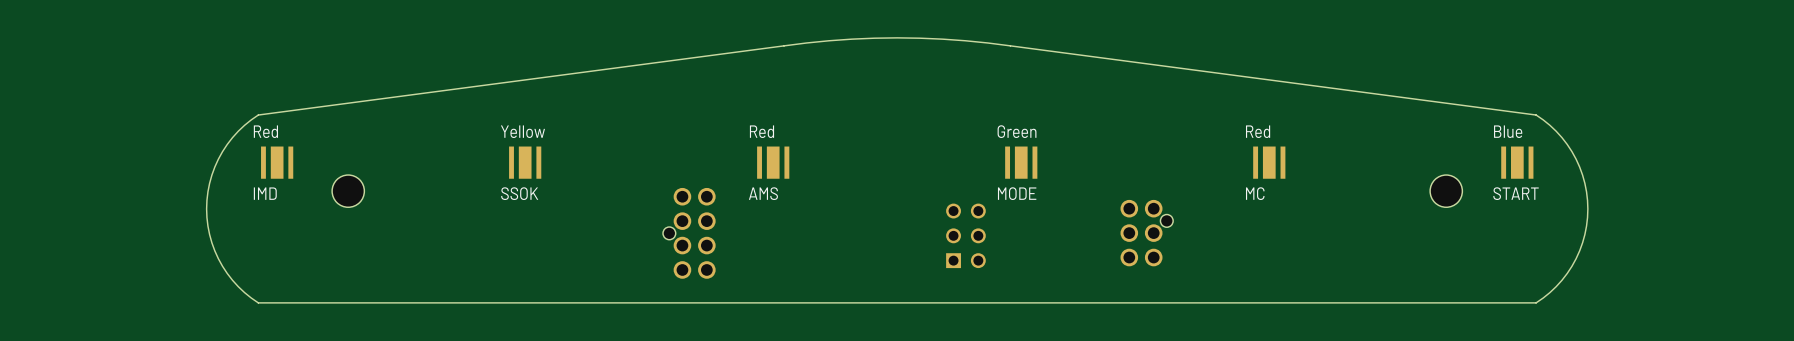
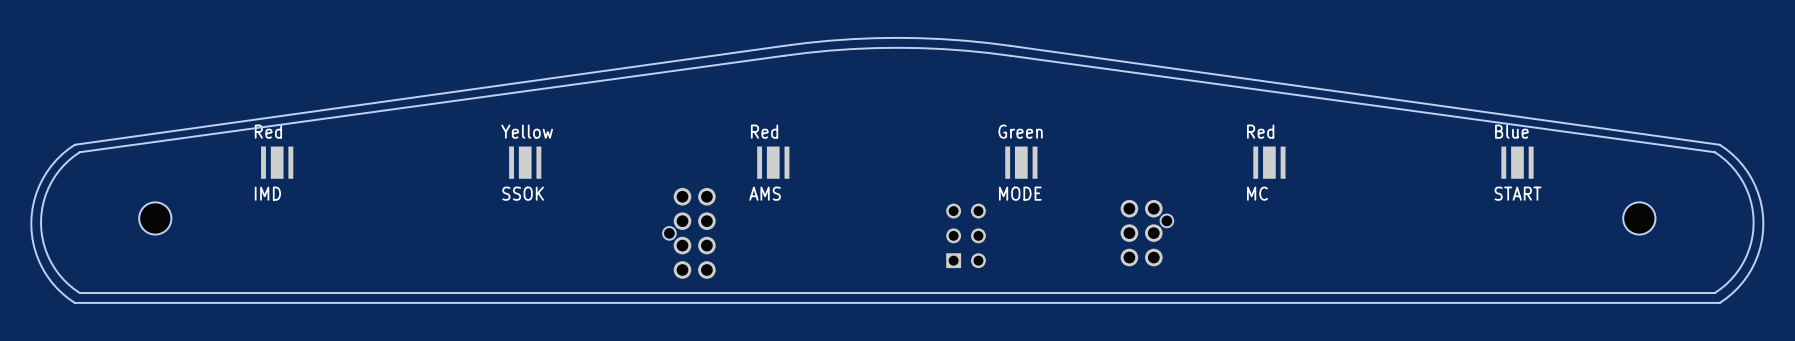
board edge: (784, 45) (258, 115) (238, 131) (222, 151) (211, 175) (206, 208) (211, 242) (222, 266) (238, 286) (258, 302) -> (784, 45) (74, 144) (56, 159) (42, 178) (32, 208) (31, 223) (34, 247) (46, 275) (62, 293) (74, 302) (258, 302)
board edge: (1010, 45) (1536, 115) (1556, 131) (1571, 151) (1582, 175) (1587, 208) (1582, 242) (1571, 266) (1556, 286) (1536, 302) -> (1010, 45) (1719, 144) (1737, 159) (1751, 178) (1762, 208) (1763, 223) (1760, 247) (1747, 275) (1732, 293) (1719, 302) (1536, 302)
board edge: none -> (1010, 55) (1714, 152) (1735, 170) (1746, 188) (1753, 215) (1751, 243) (1746, 256) (1735, 274) (1714, 292) (79, 292) (68, 284) (54, 268) (48, 256) (42, 236) (41, 215) (48, 188) (59, 170) (79, 152) (806, 52) (874, 48) (920, 48) (1010, 55)
hole position: (348, 191) -> (155, 218)
hole position: (1446, 191) -> (1639, 218)

